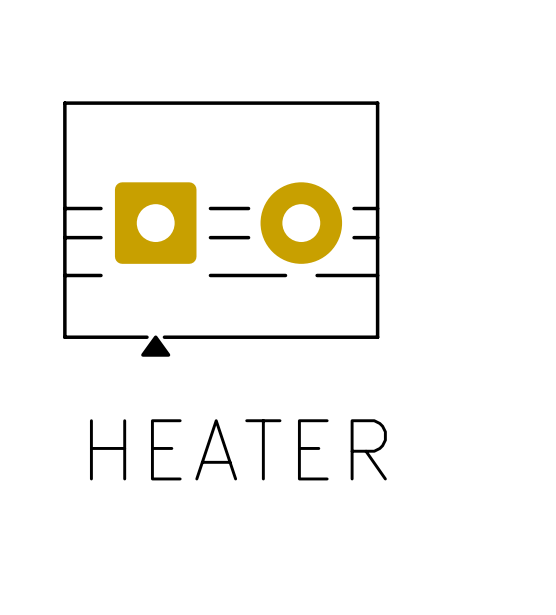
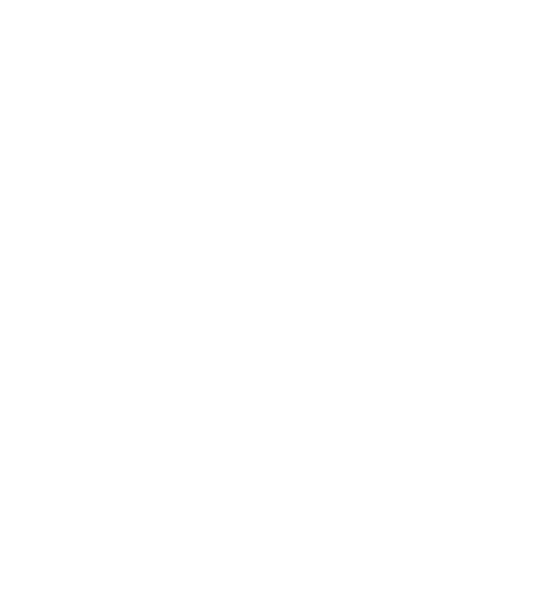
part: (221, 229) -> none
text: HEATER (238, 449) -> none

